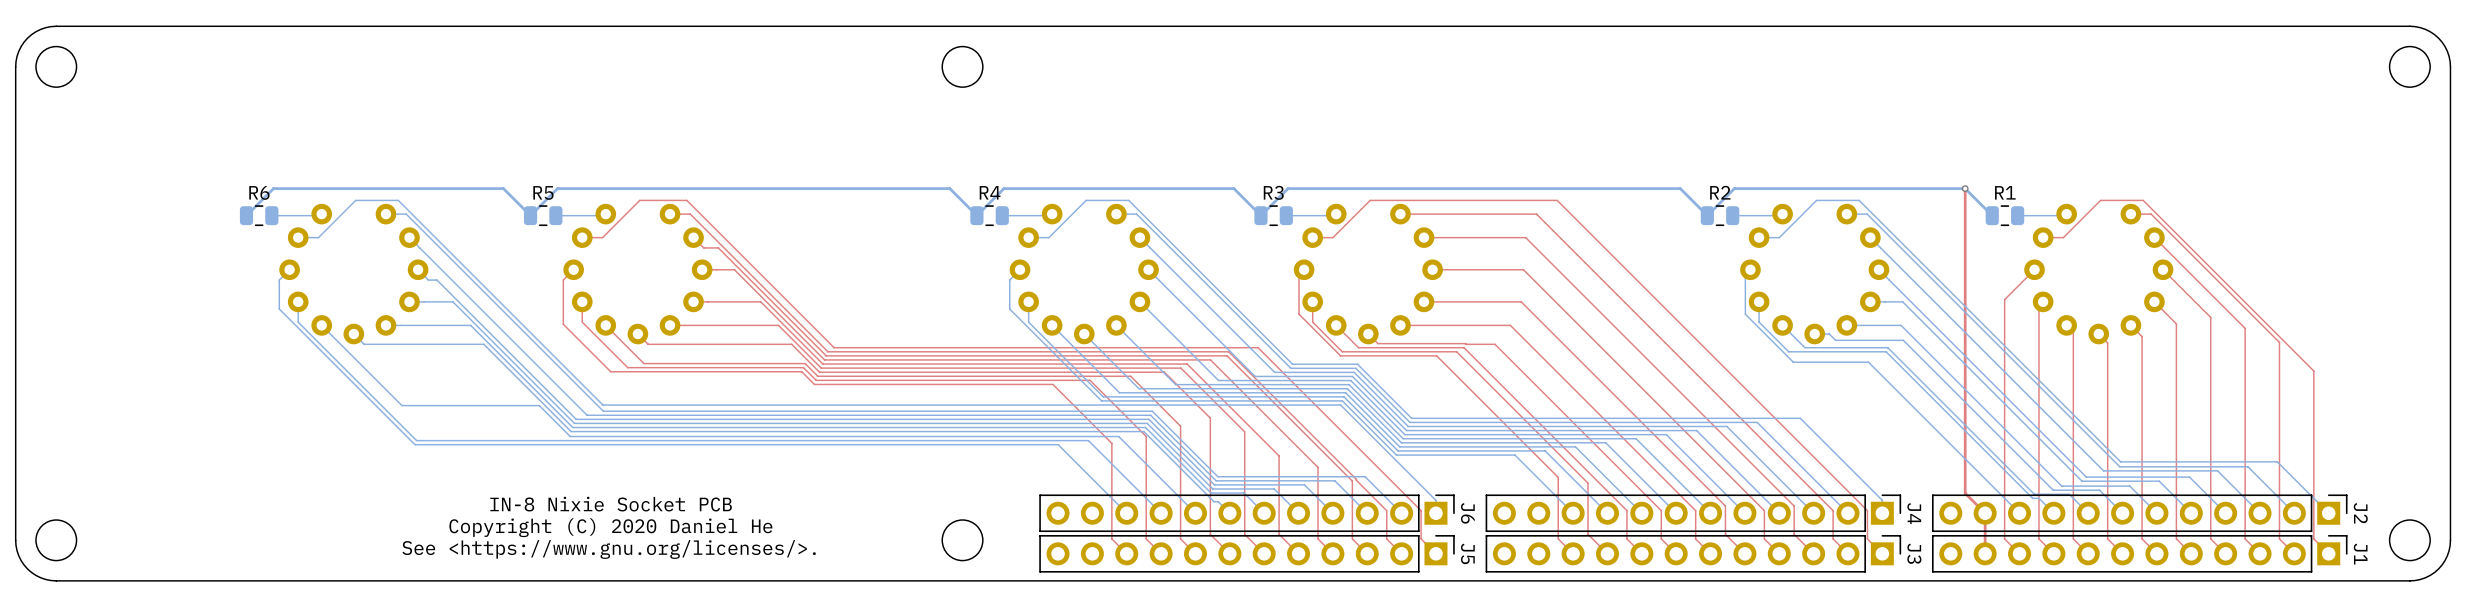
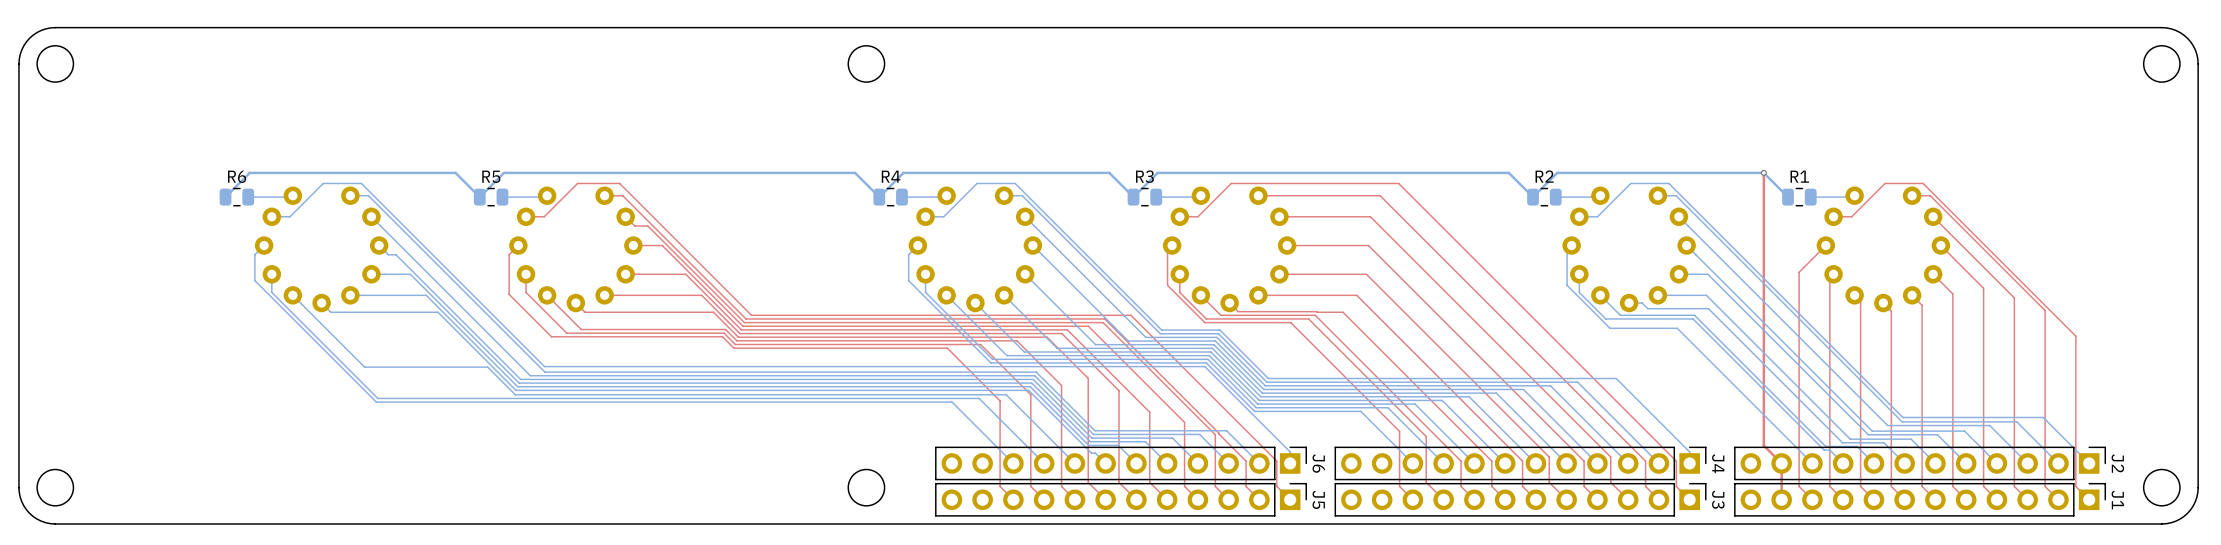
text: IN-8 Nixie Socket PCB (611, 504) -> none
text: Copyright (C) 2020 Daniel He (610, 527) -> none
text: See <https://www.gnu.org/licenses/>. (609, 549) -> none

